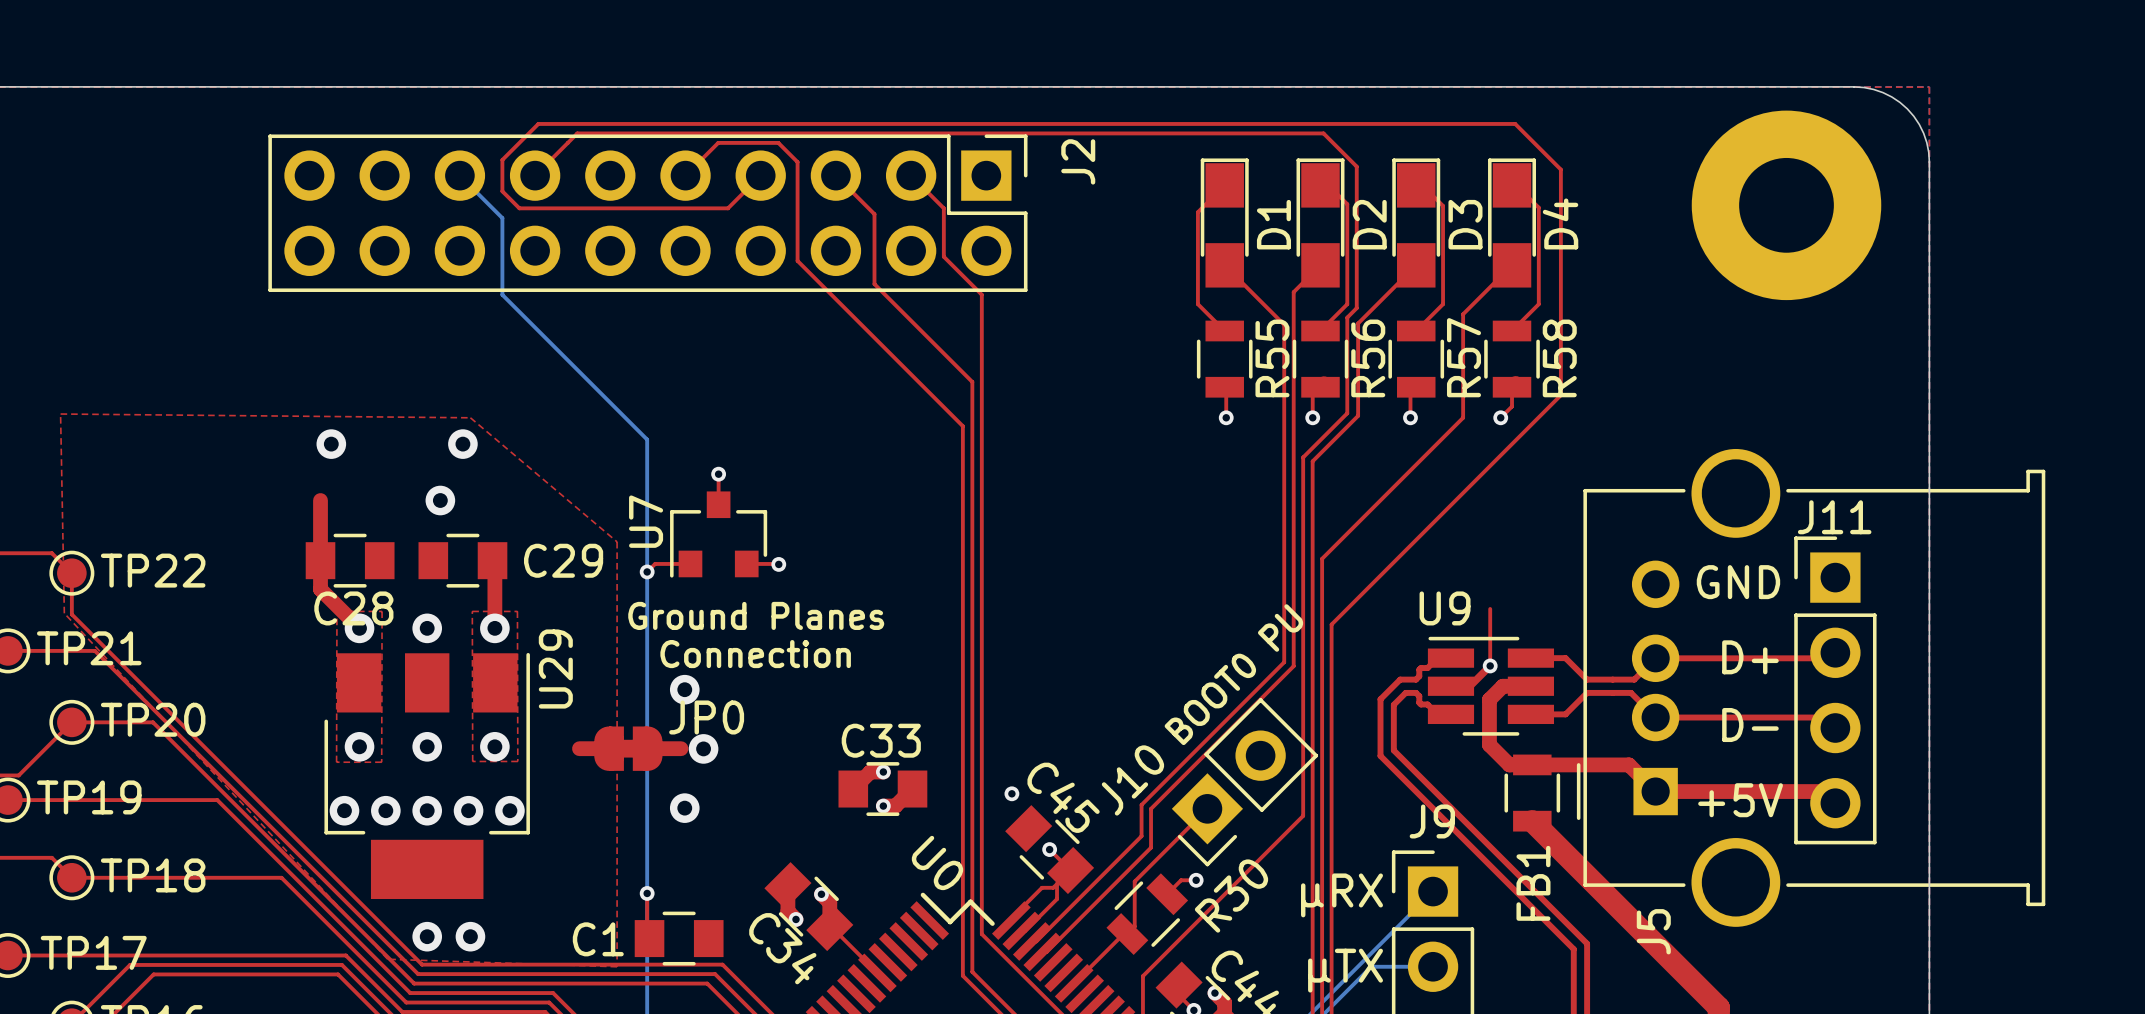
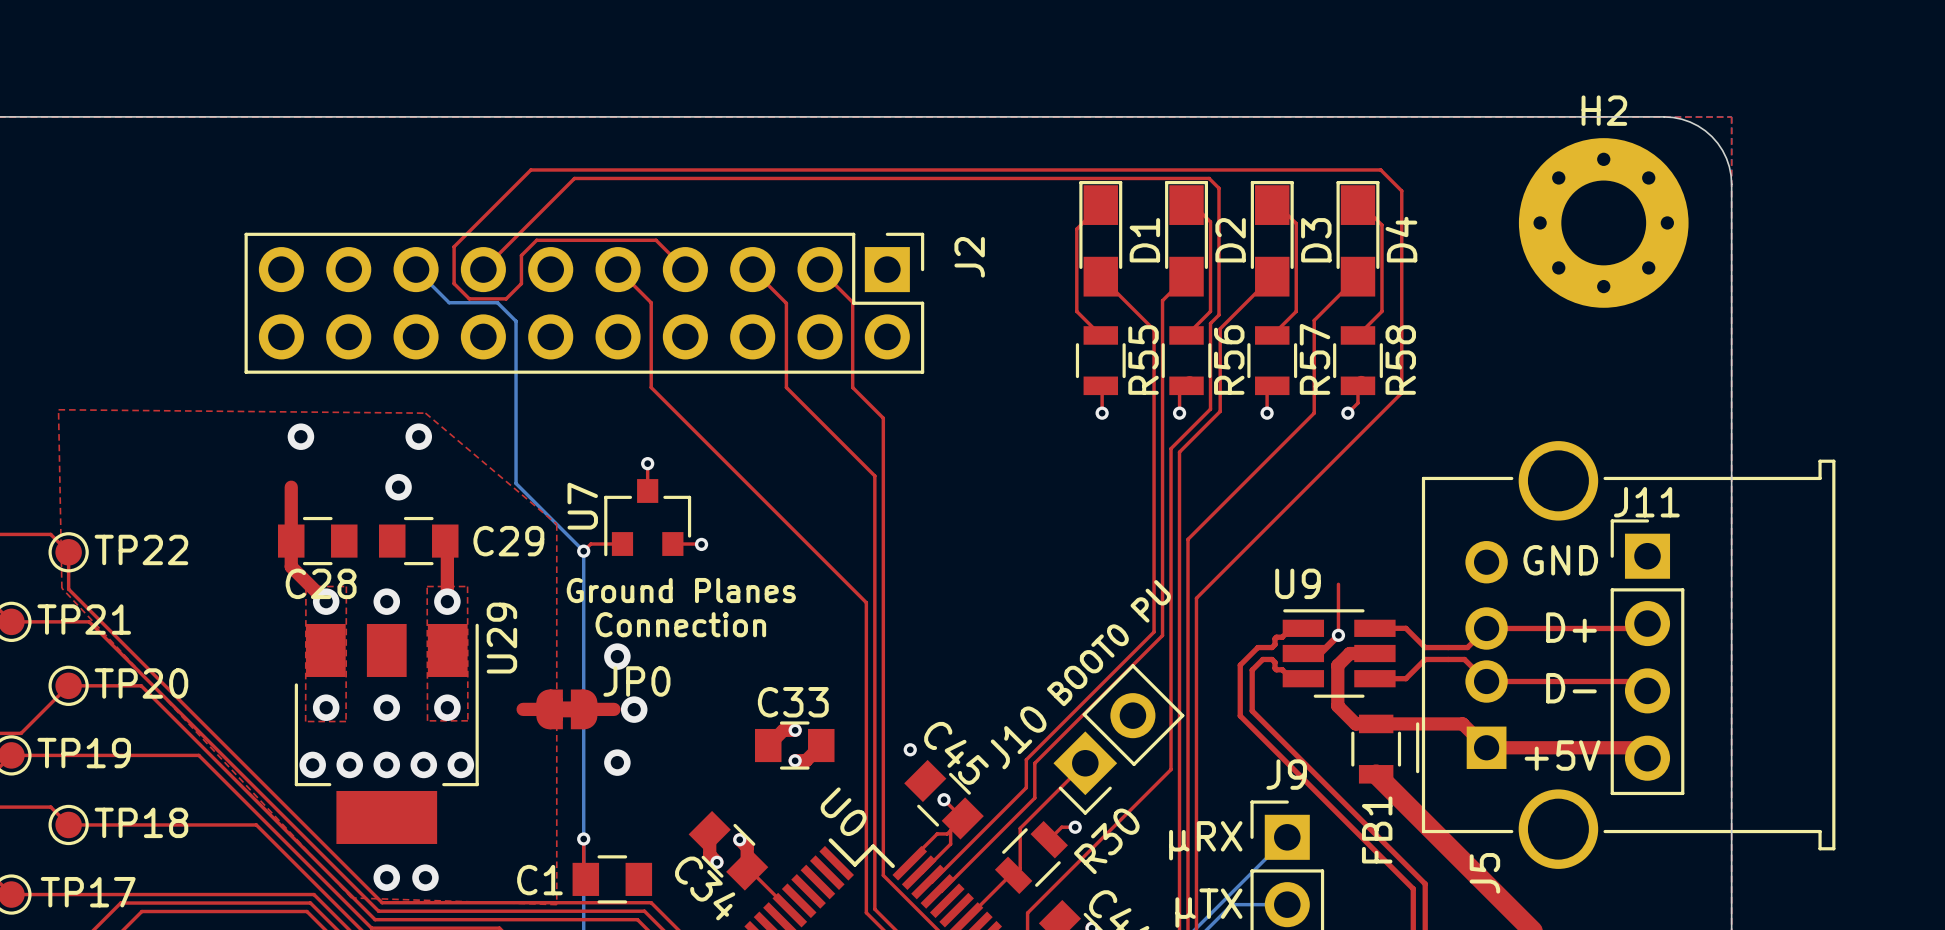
top track: (1537, 146) (1515, 123) (538, 123) (502, 159) (502, 191) (519, 208) (728, 208) (760, 175) -> (1380, 169) (530, 169) (454, 246) (454, 283) (469, 298) (506, 298) (521, 283) (521, 255) (536, 240) (656, 240) (685, 269)
top track: (1345, 155) (1323, 133) (577, 133) (535, 175) -> (1209, 178) (574, 178) (483, 269)
bottom track: (459, 175) (502, 218) (502, 294) (647, 439) (647, 571) -> (416, 269) (449, 302) (497, 302) (516, 321) (516, 483) (583, 551)
top track: (685, 175) (718, 142) (778, 142) (797, 162) (797, 260) (962, 426) (962, 629) -> (618, 269) (651, 302) (651, 387) (866, 602)
top track: (835, 175) (874, 214) (874, 284) (972, 381) (972, 487) -> (752, 269) (786, 303) (786, 387) (874, 475)
top track: (911, 175) (943, 208) (943, 256) (981, 294) (981, 423) -> (820, 269) (852, 302) (852, 387) (883, 418)
part: (1786, 205) -> none
H2: none -> (1603, 222)
J2 position: (647, 213) -> (584, 303)

